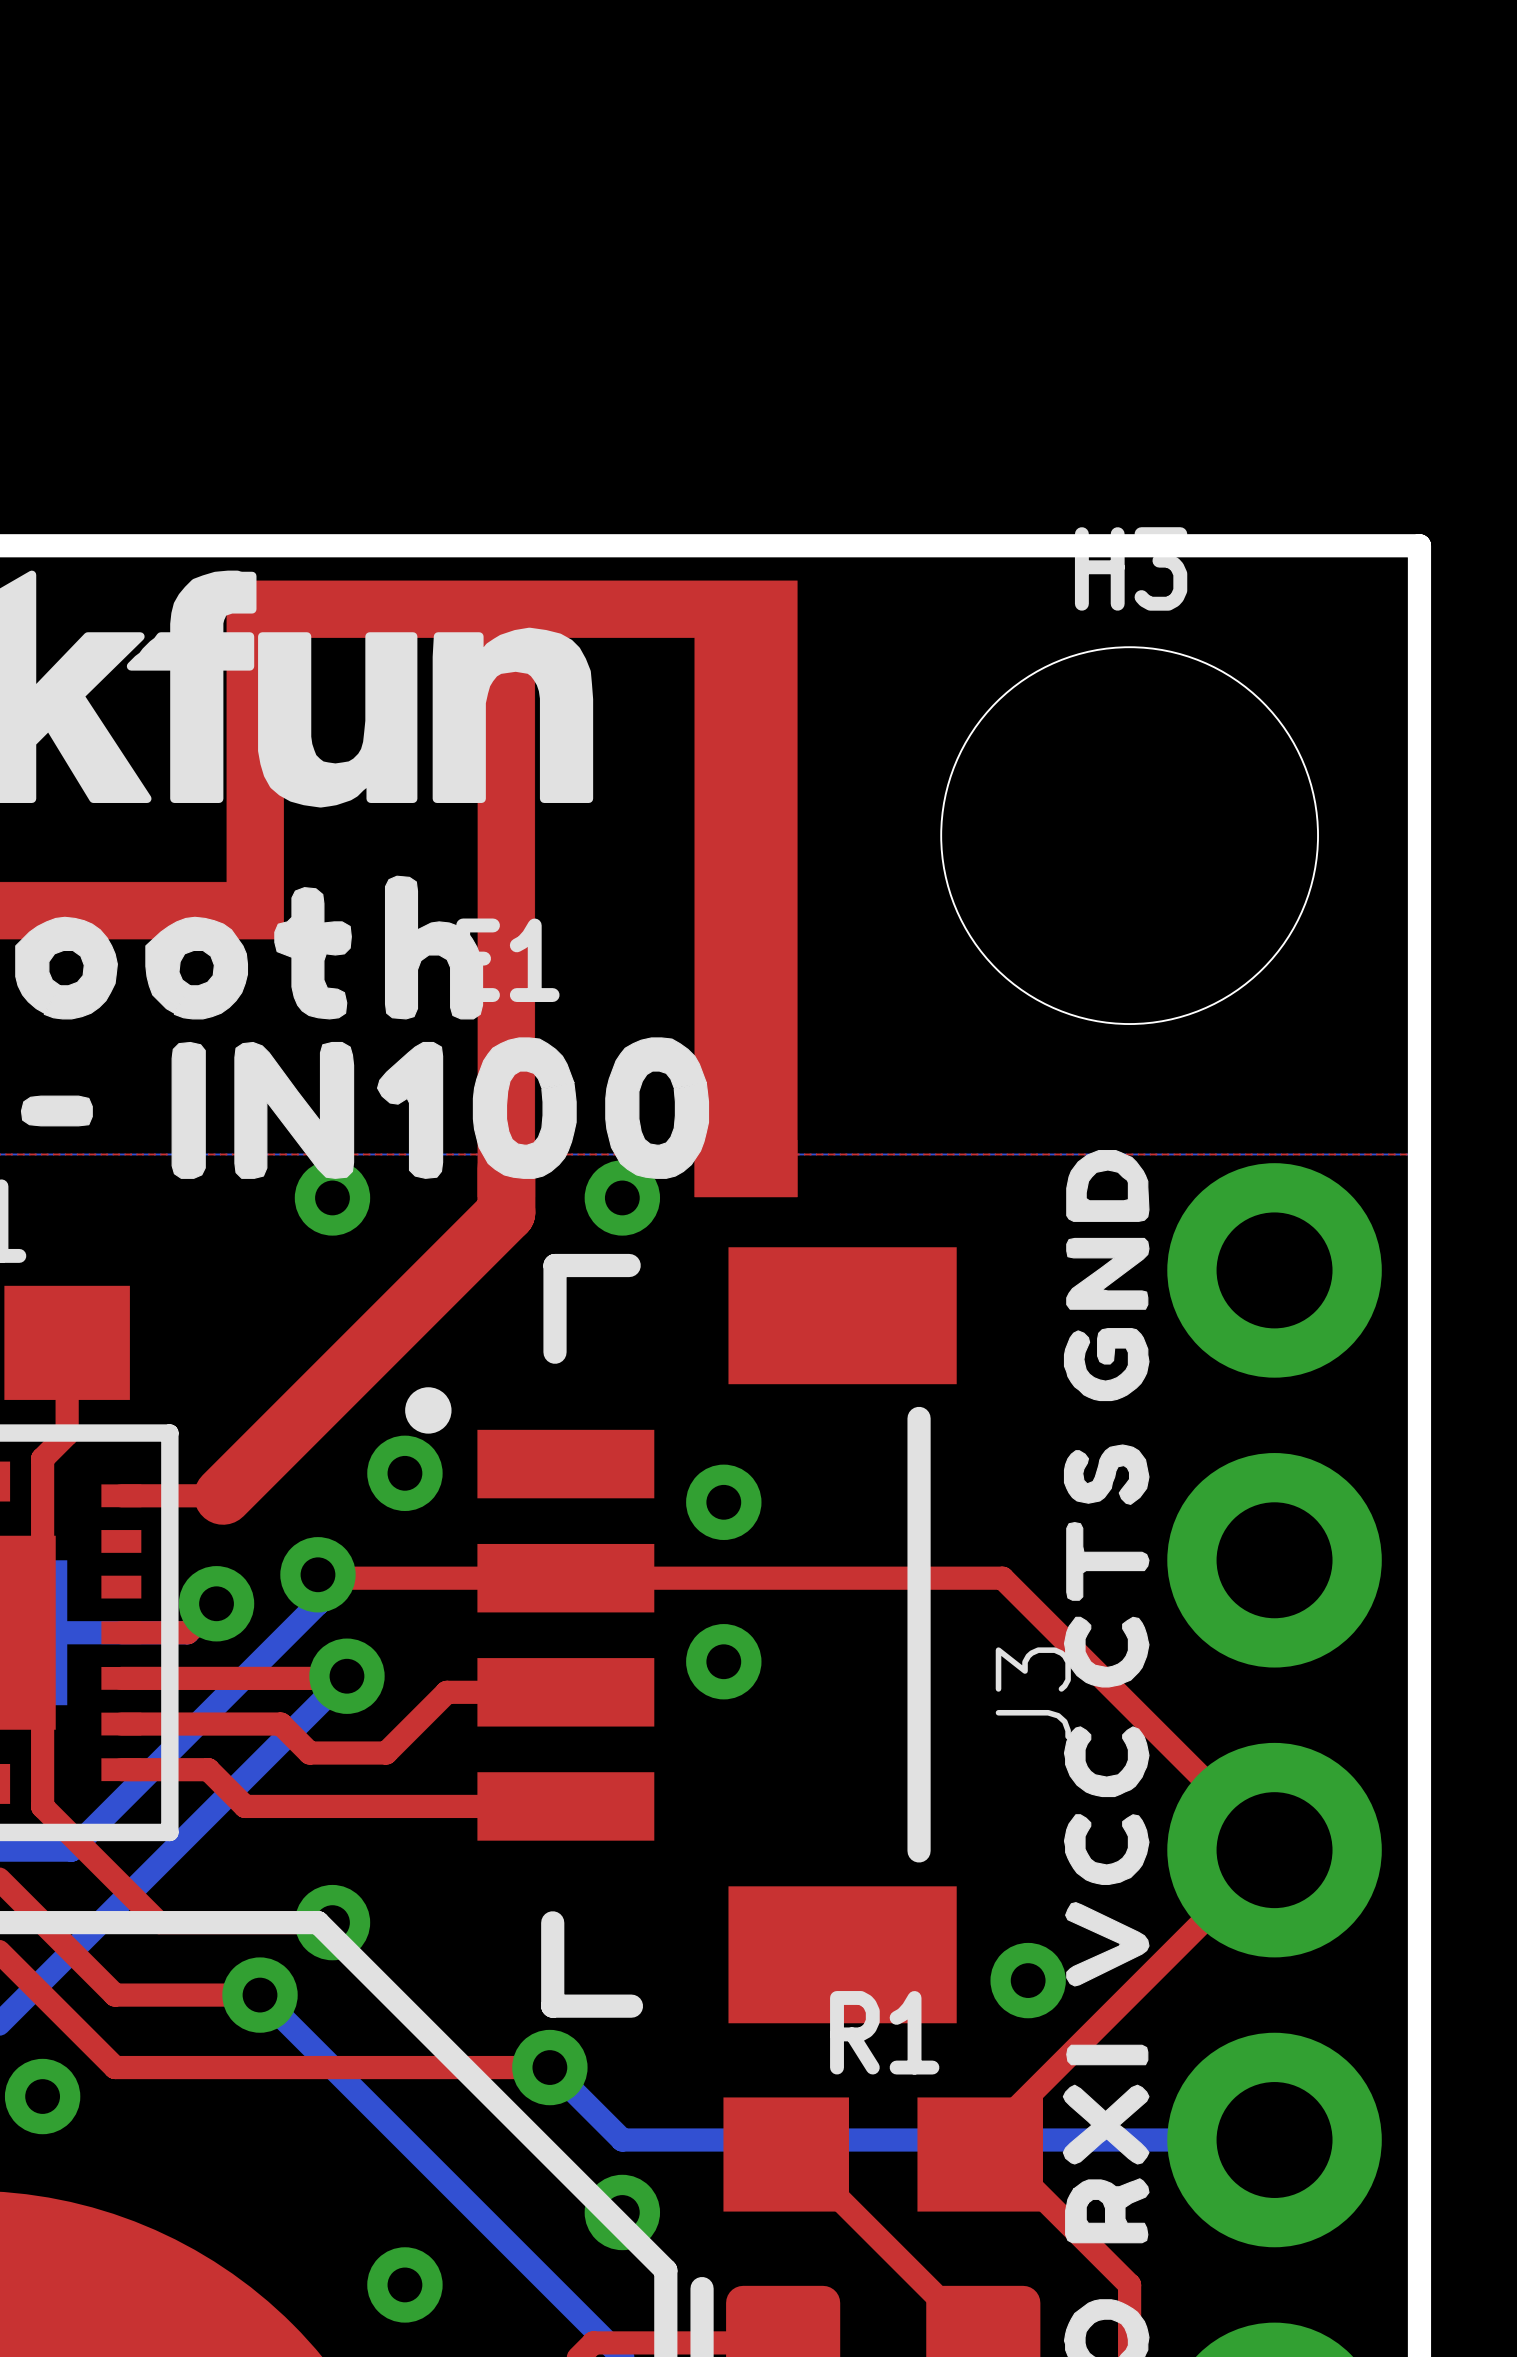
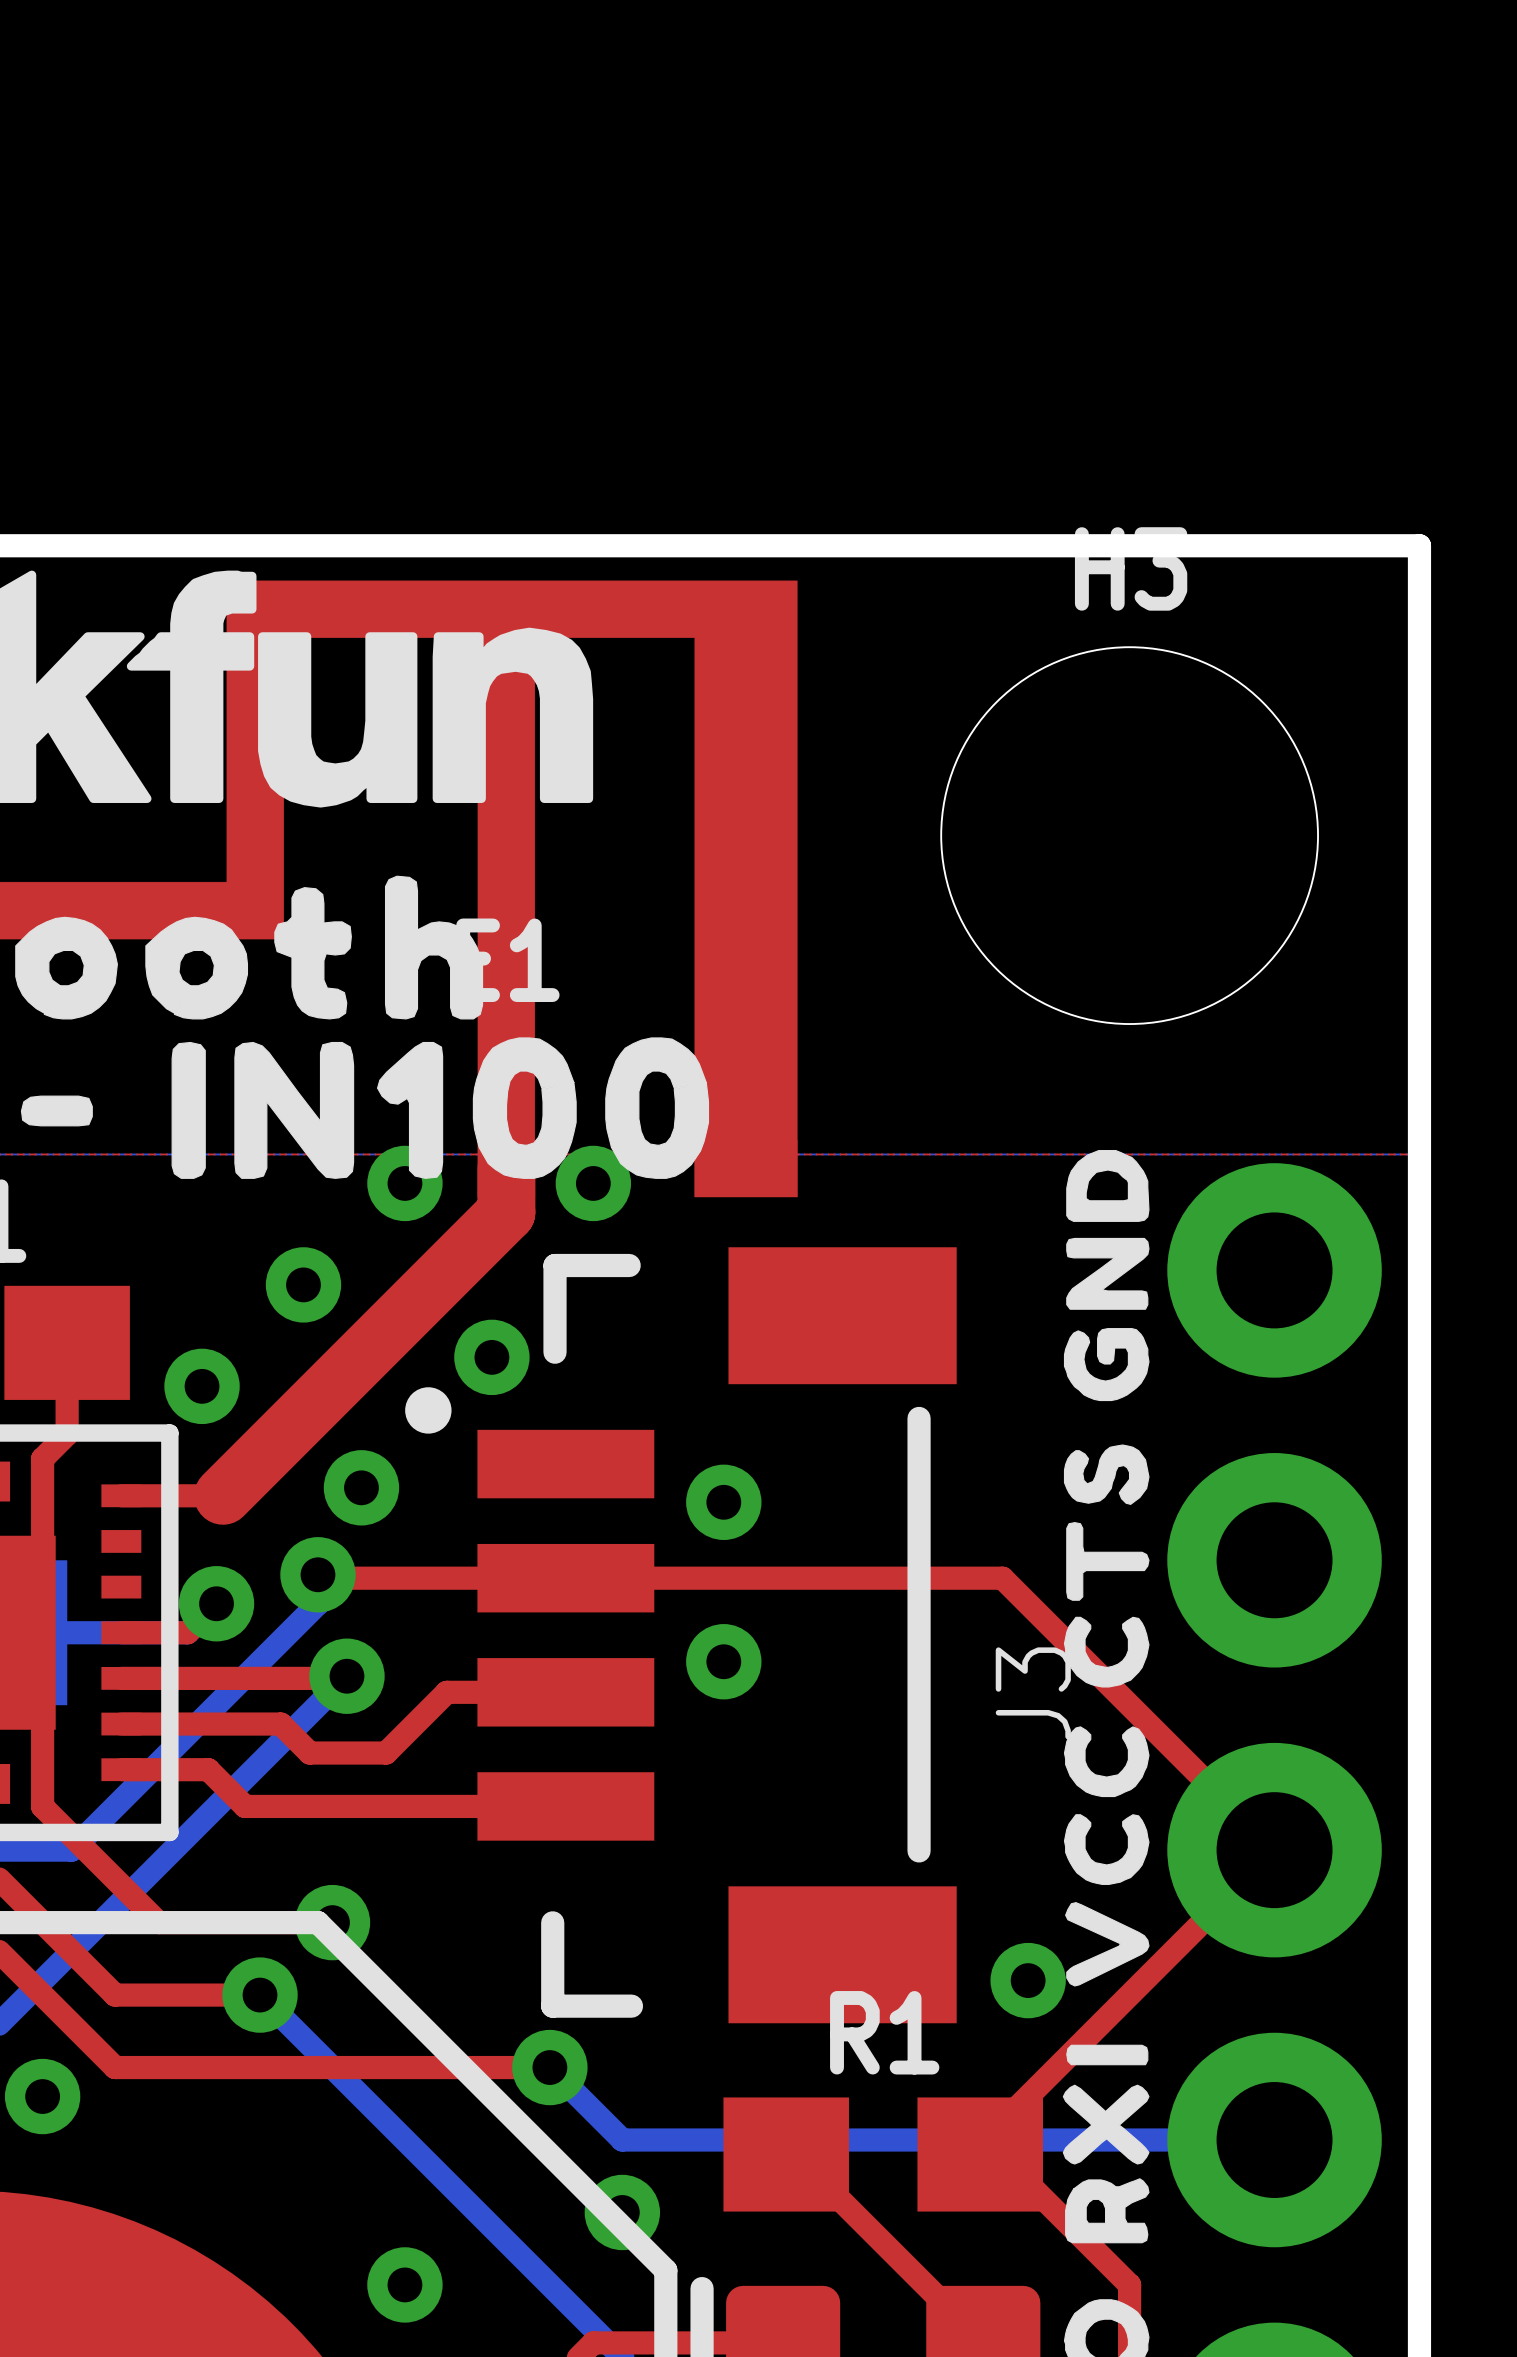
via position: (332, 1197) -> (404, 1183)
via position: (622, 1197) -> (593, 1183)
via: none -> (303, 1284)
via: none -> (491, 1357)
via: none -> (202, 1386)
via position: (404, 1473) -> (361, 1487)

